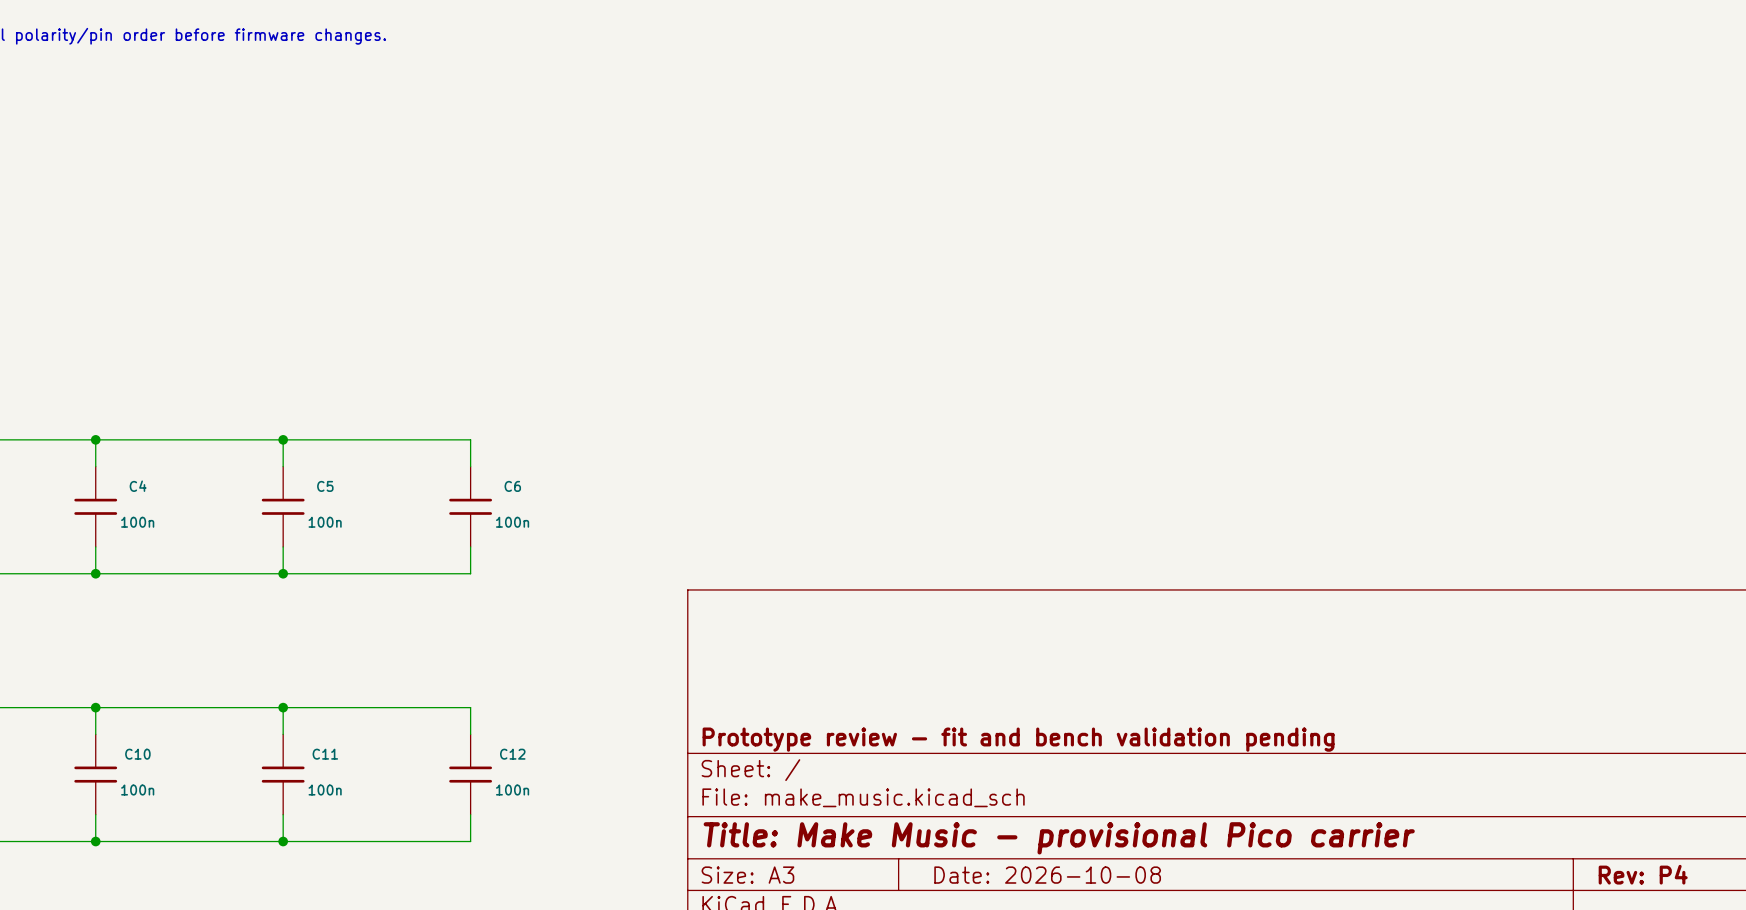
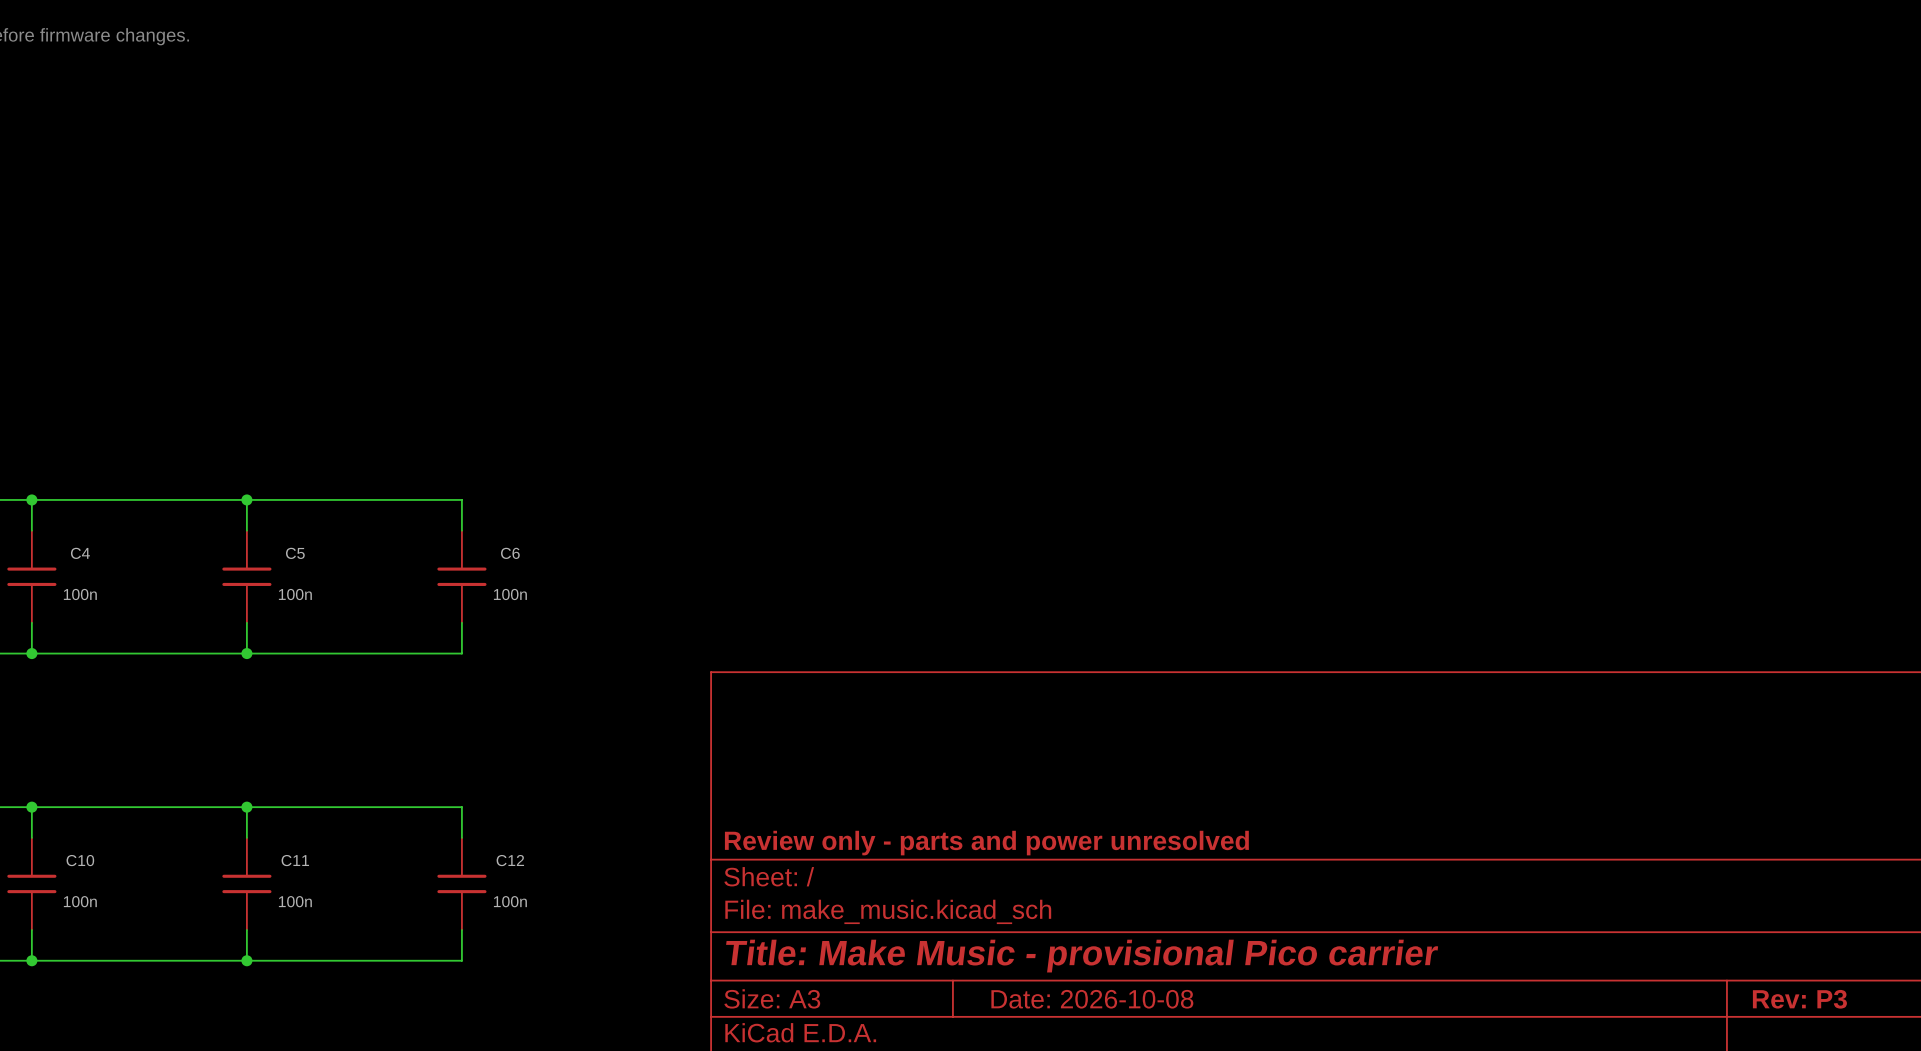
title block: Prototype review - fit and bench validation pending (1018, 739) -> Review only - parts and power unresolved (986, 843)
title block: Rev: P4 (1643, 874) -> Rev: P3 (1799, 999)

